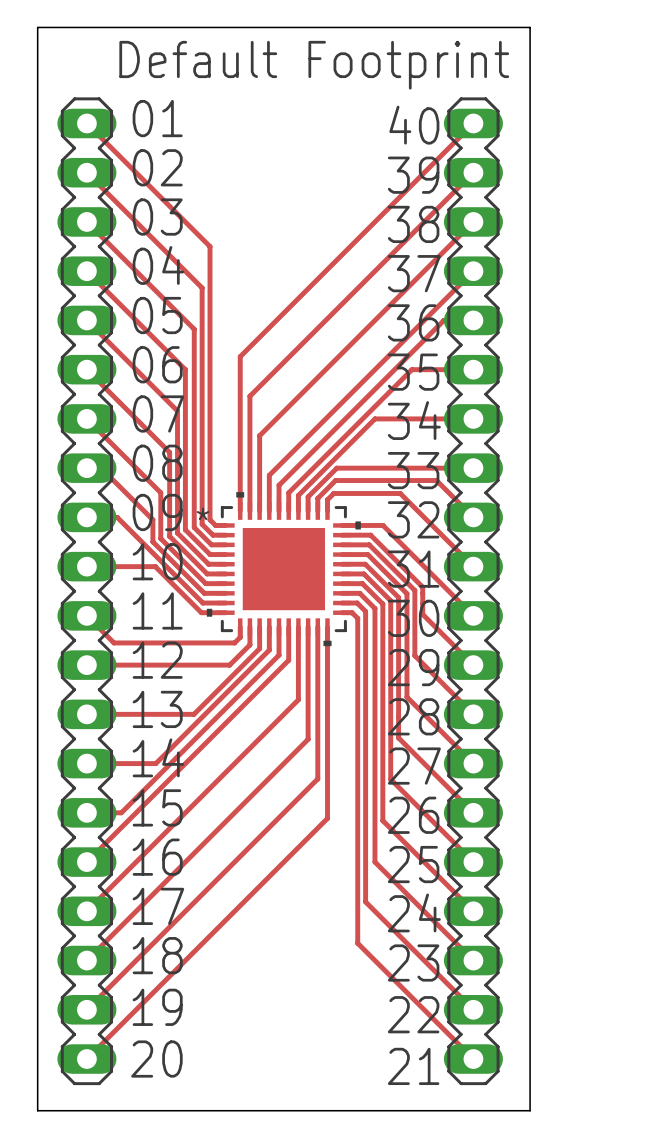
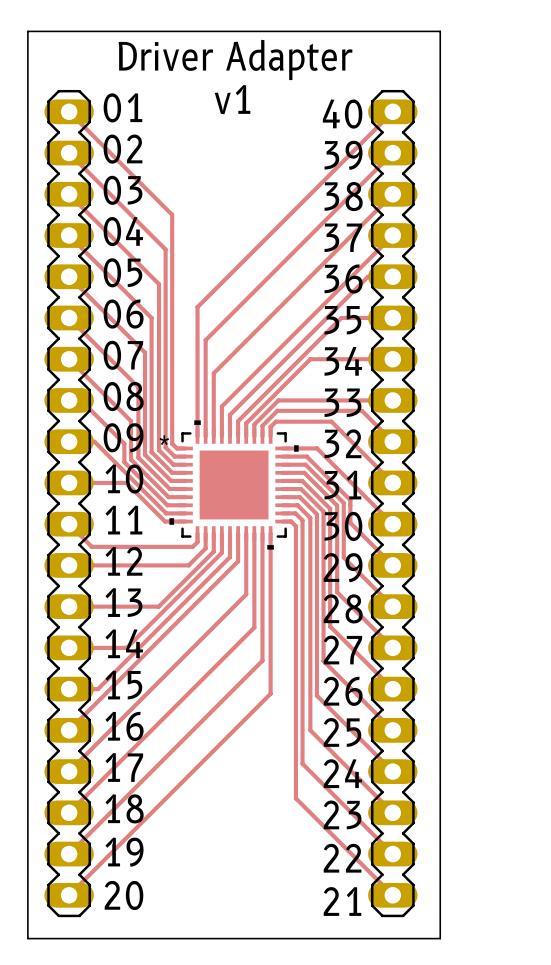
text: none -> Driver Adapter (235, 59)
text: Default Footprint (314, 65) -> none
text: none -> v1 (232, 99)

